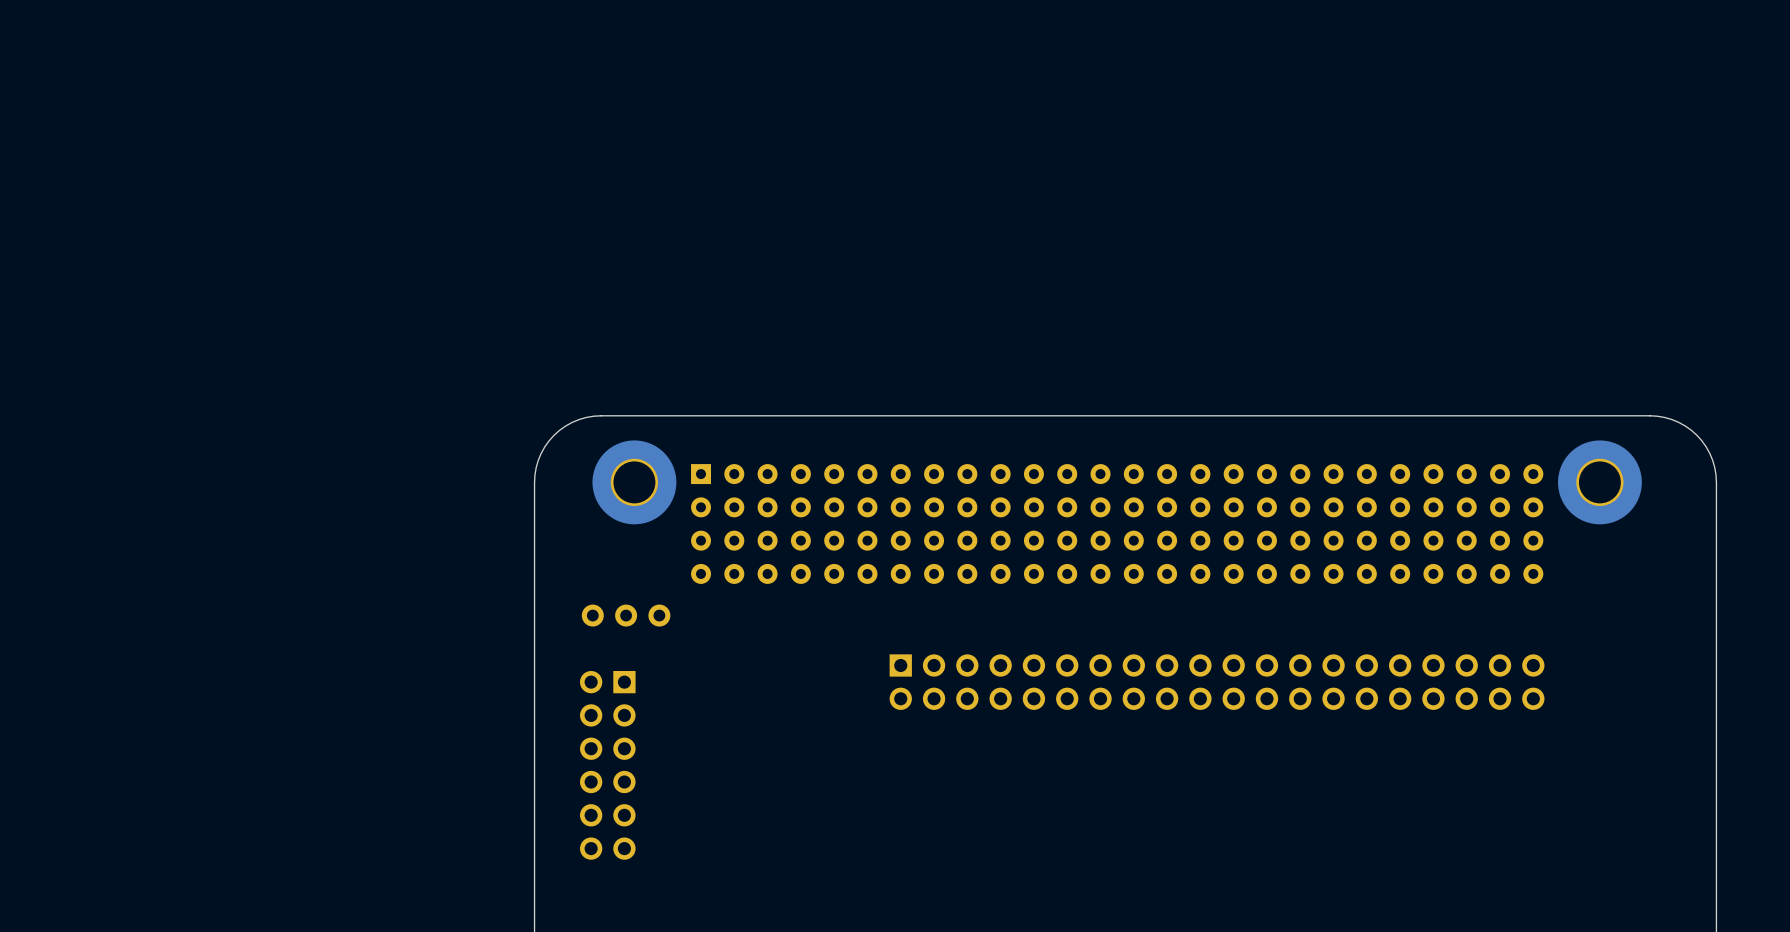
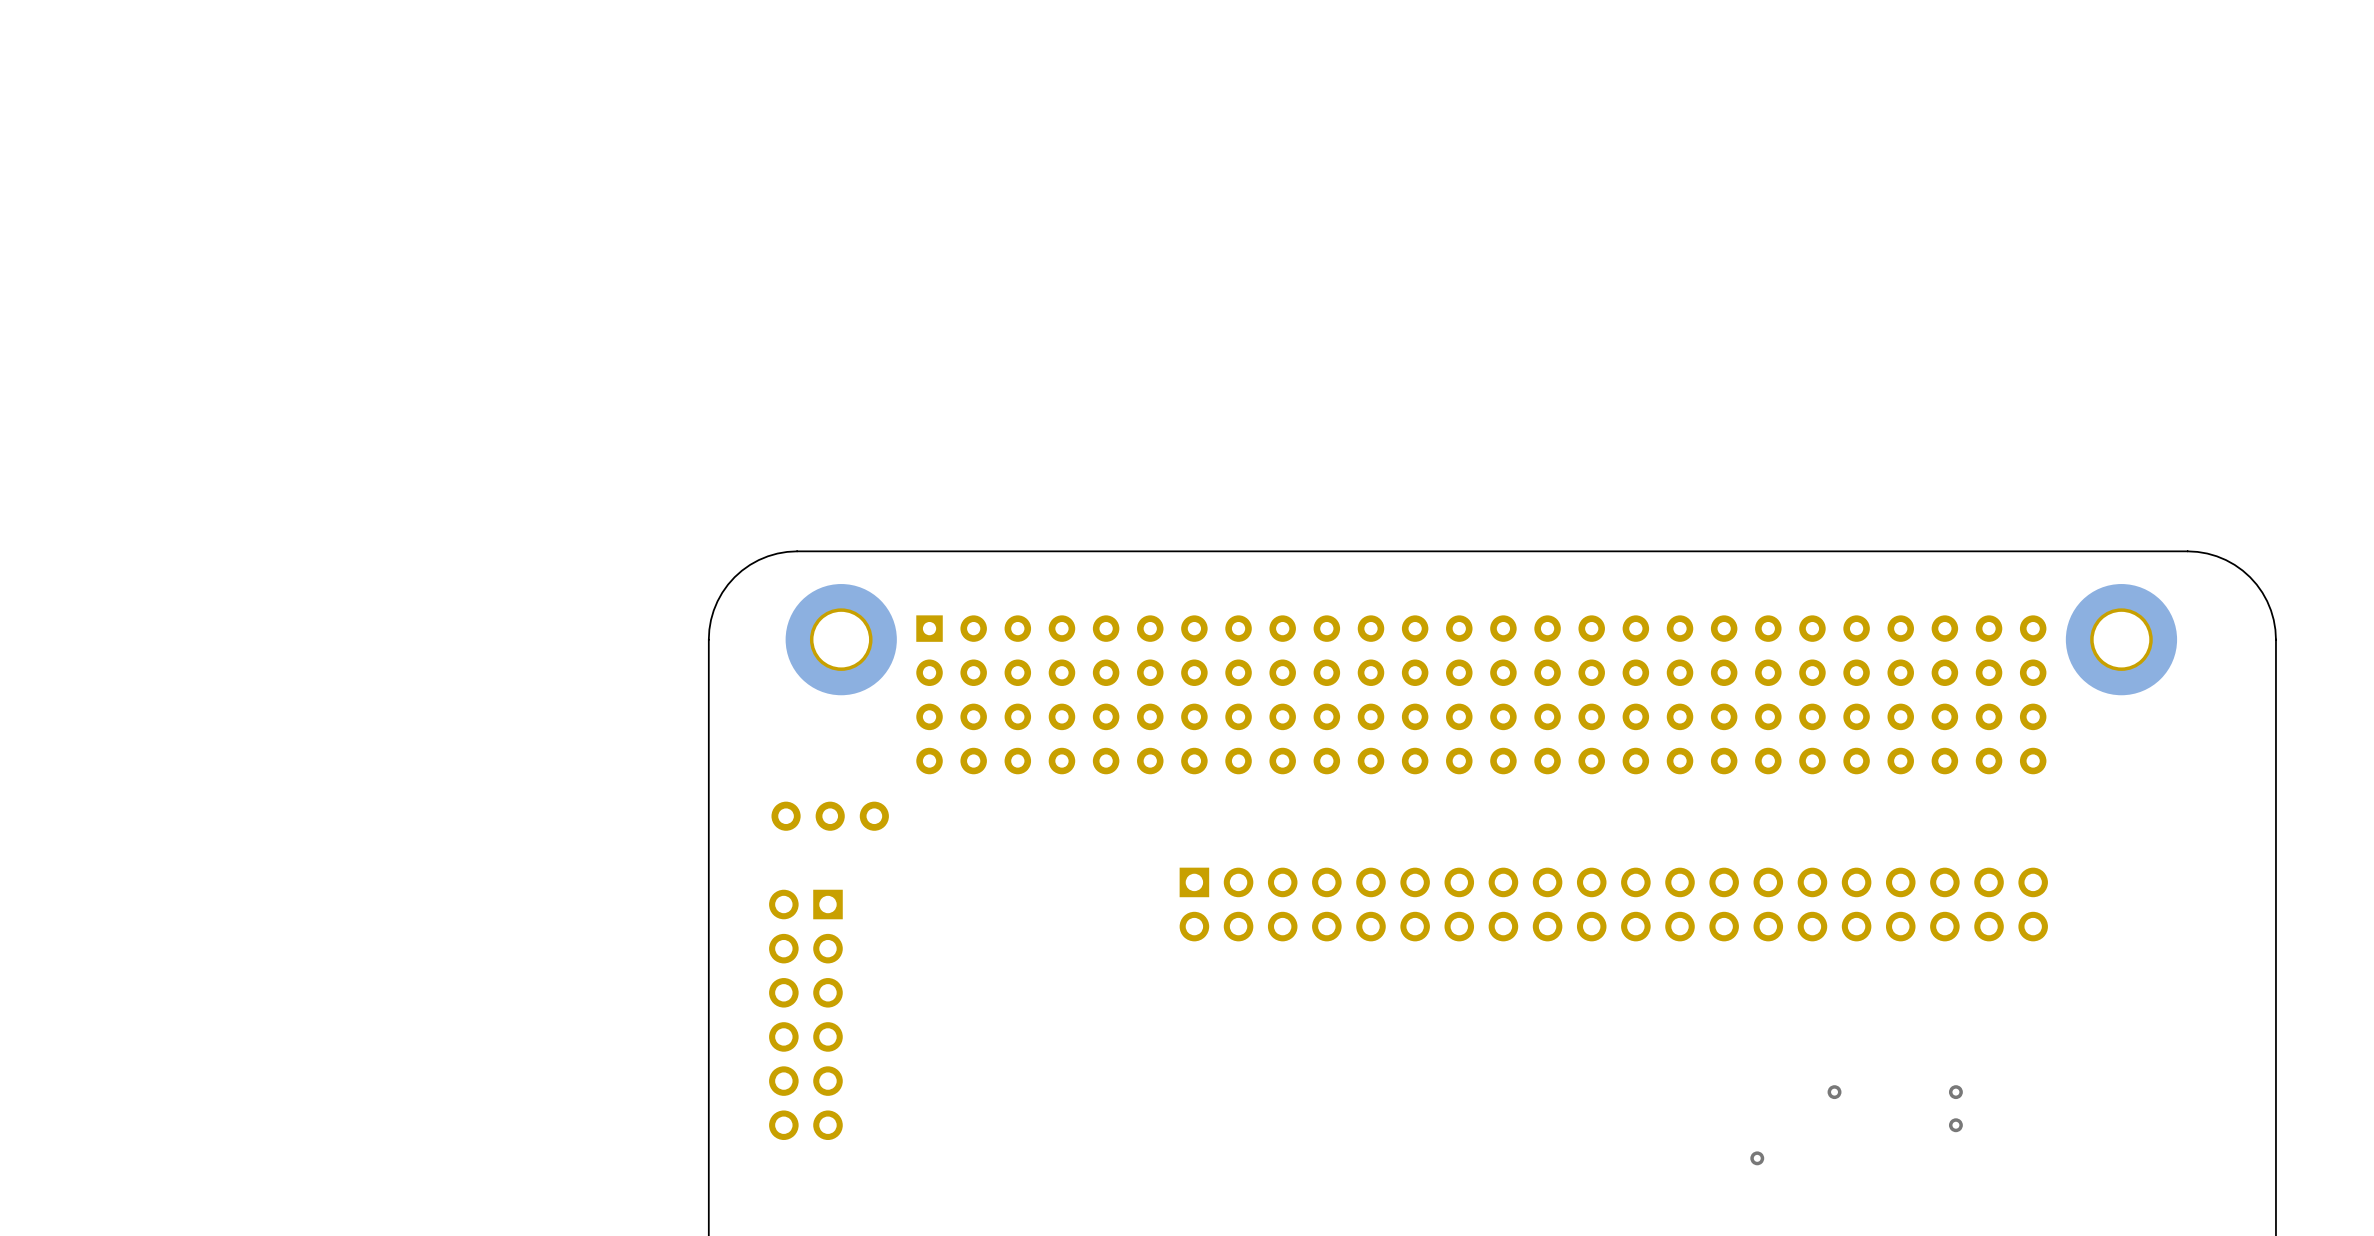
via: none -> (1834, 1092)
via: none -> (1955, 1092)
via: none -> (1955, 1125)
via: none -> (1757, 1158)

